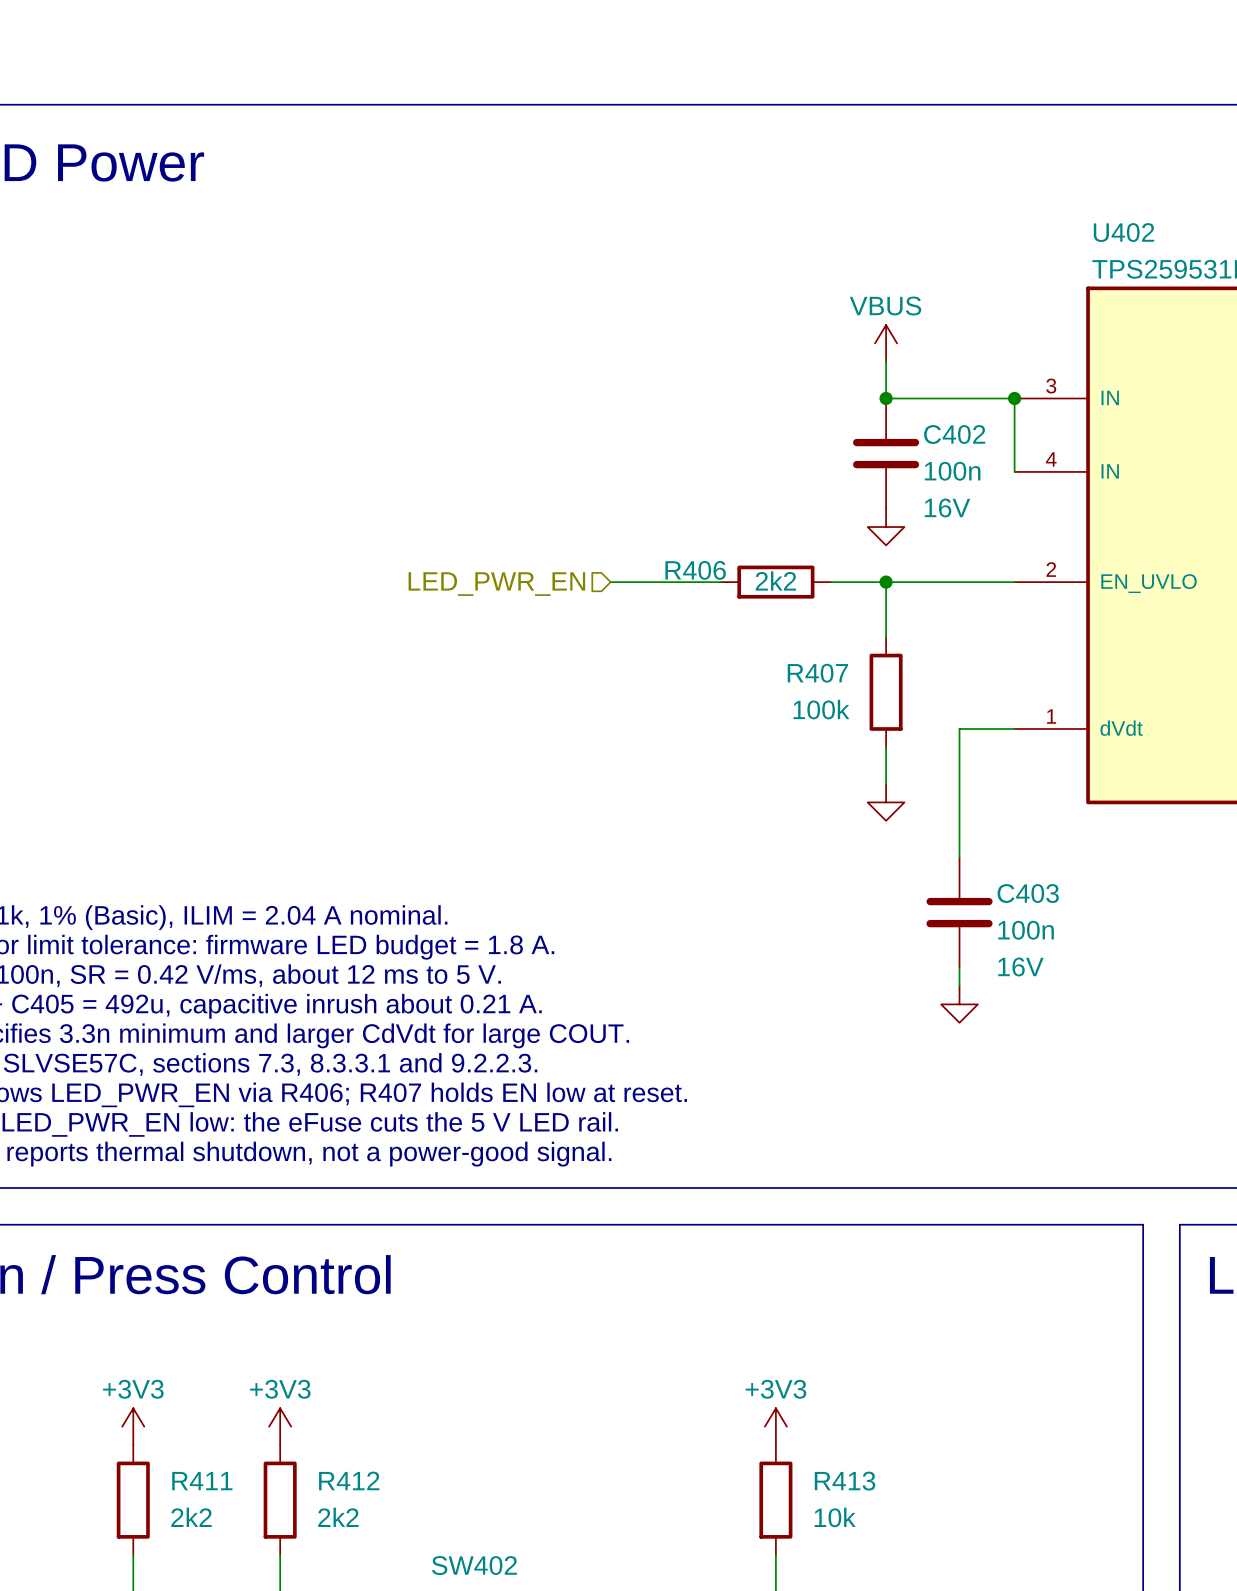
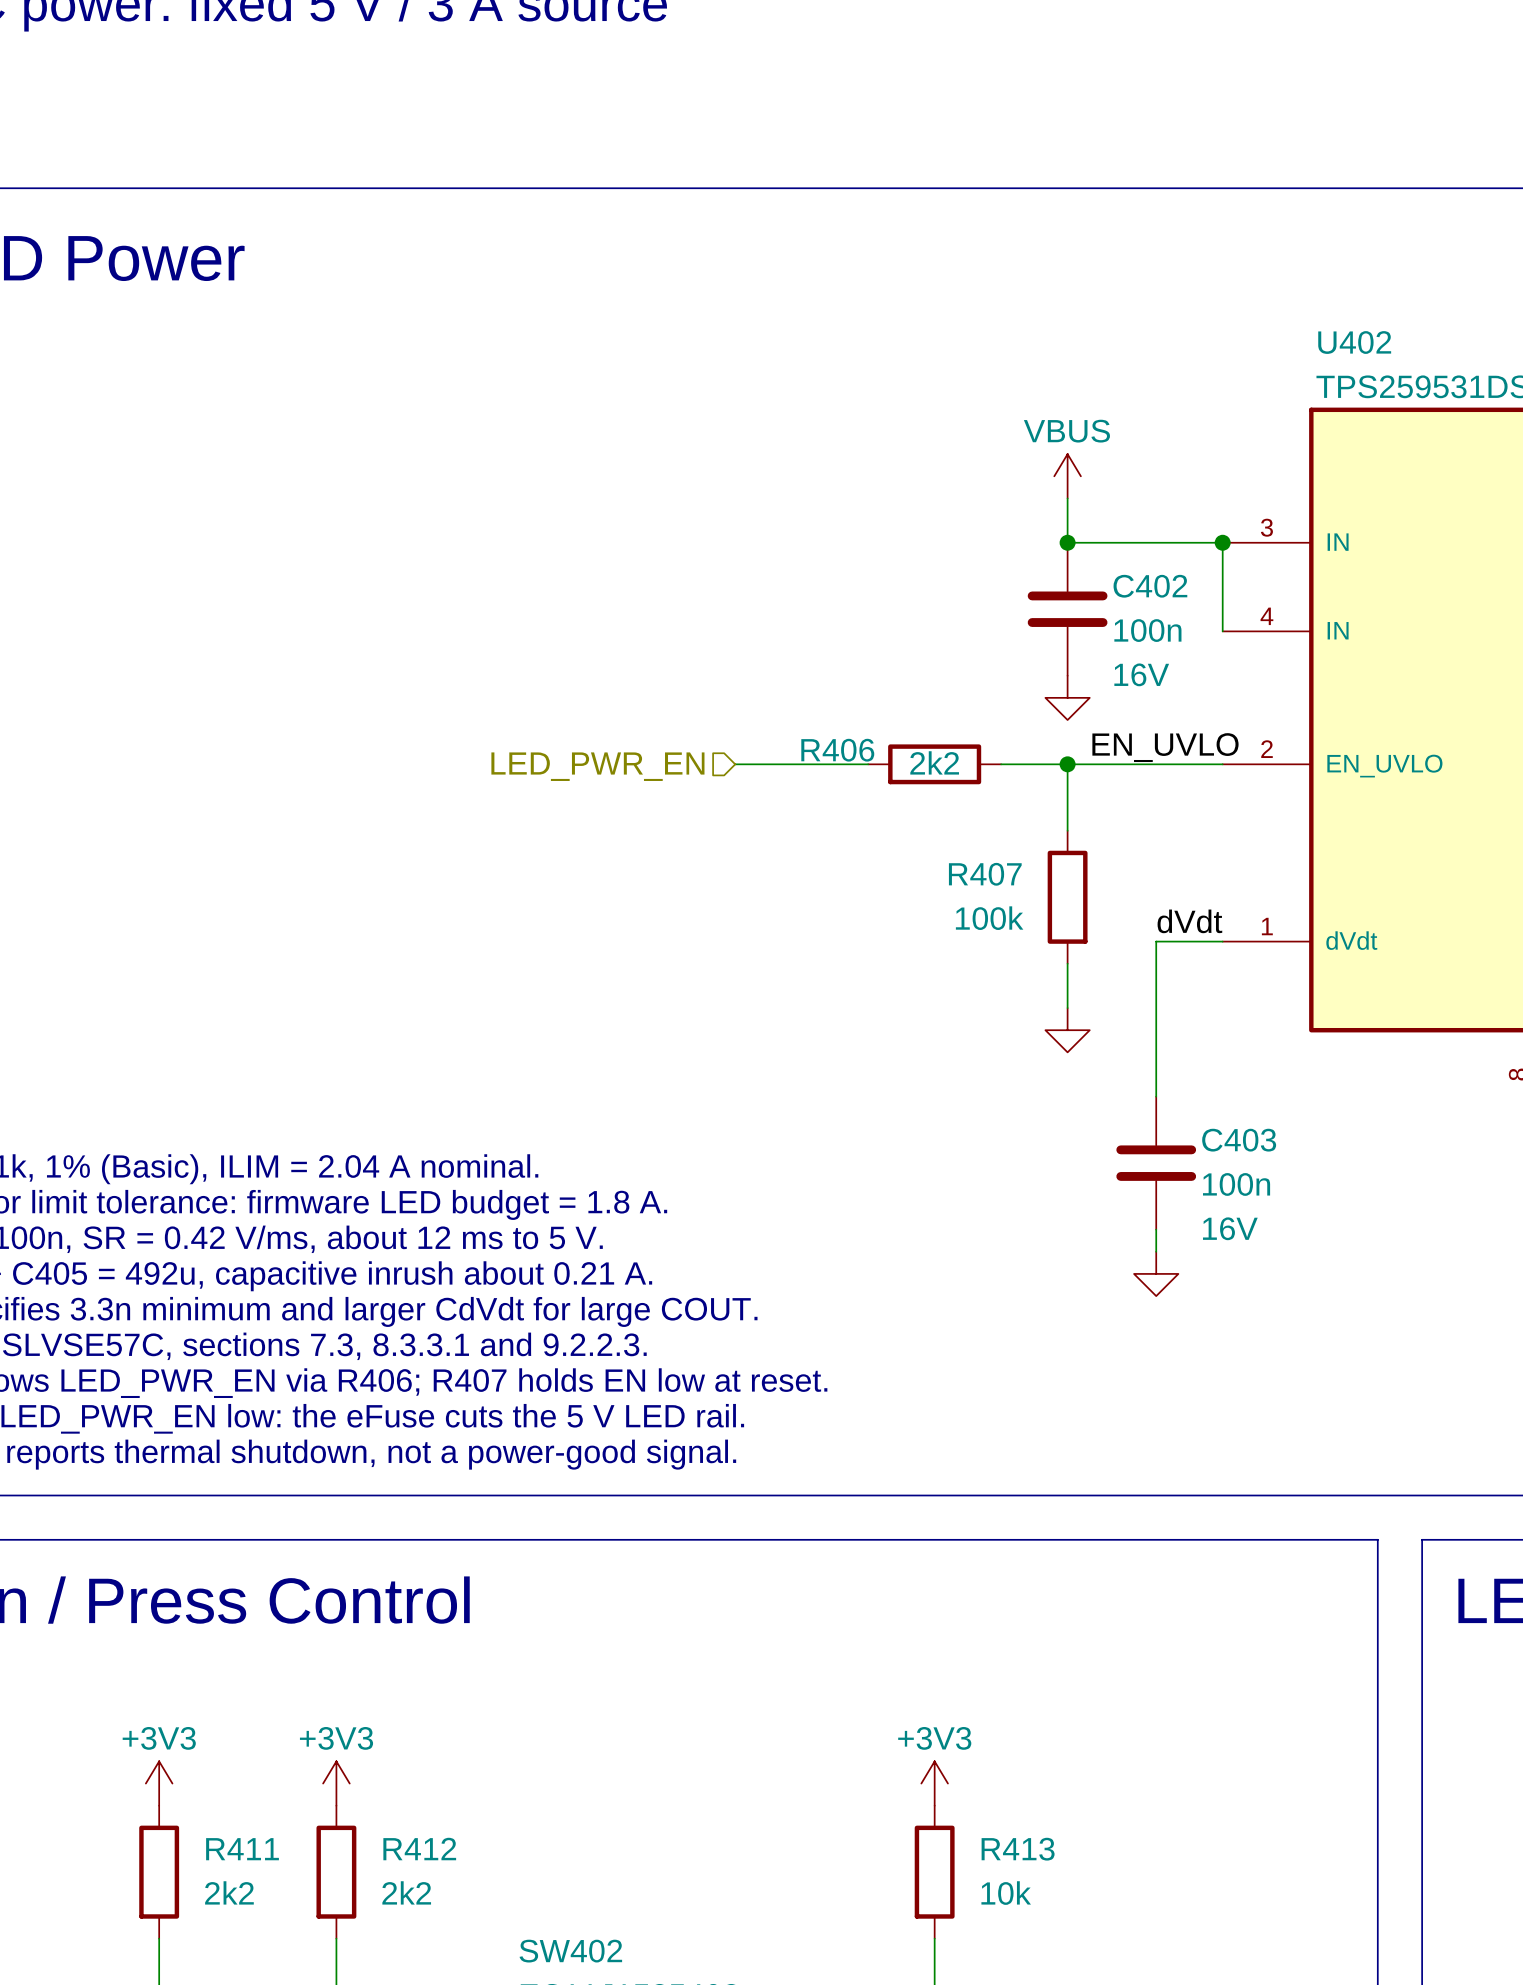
label: none -> EN_UVLO (1165, 747)
label: none -> dVdt (1189, 921)

